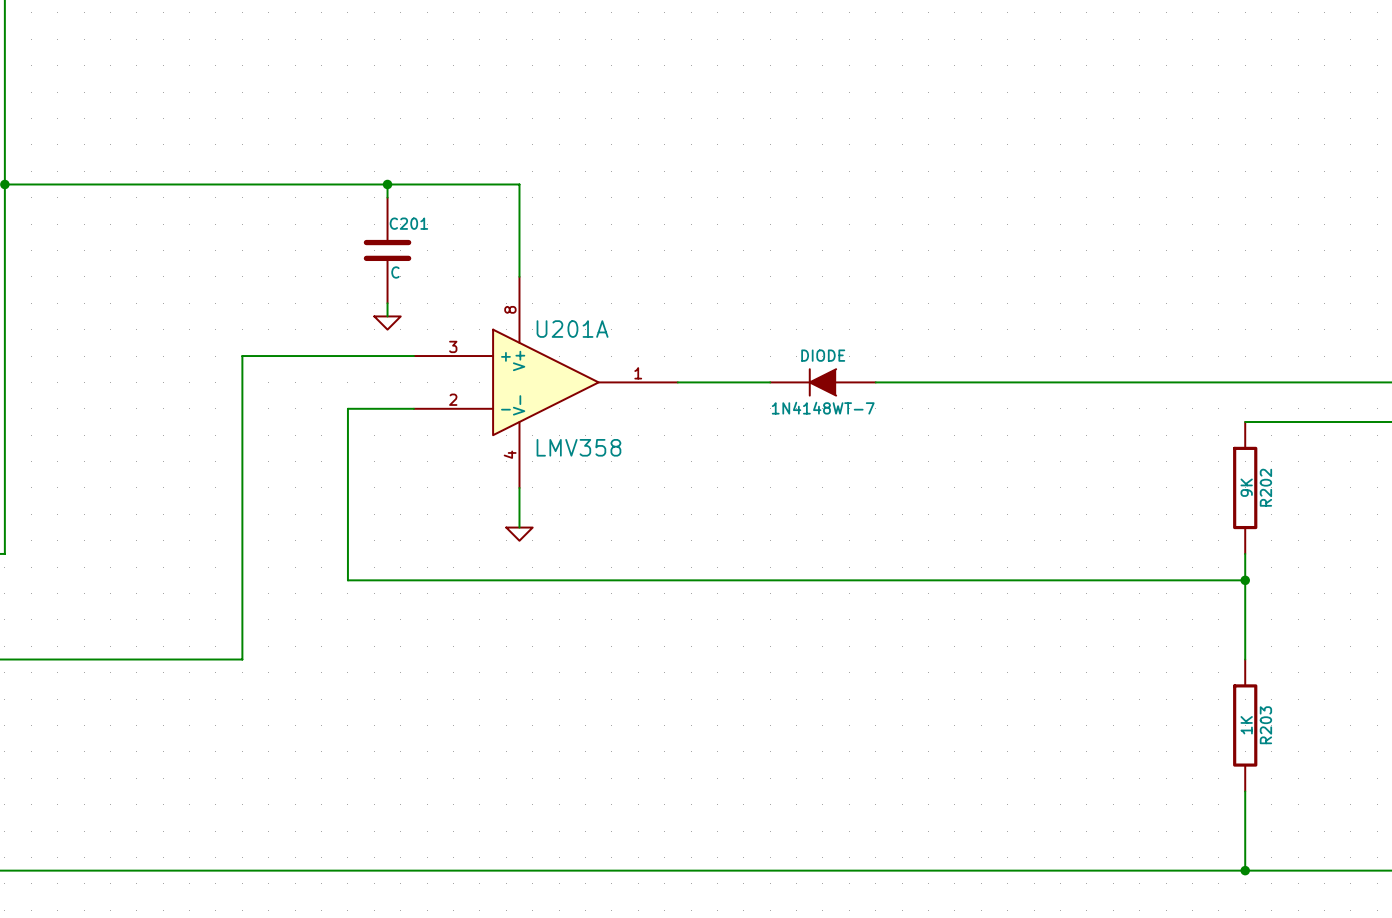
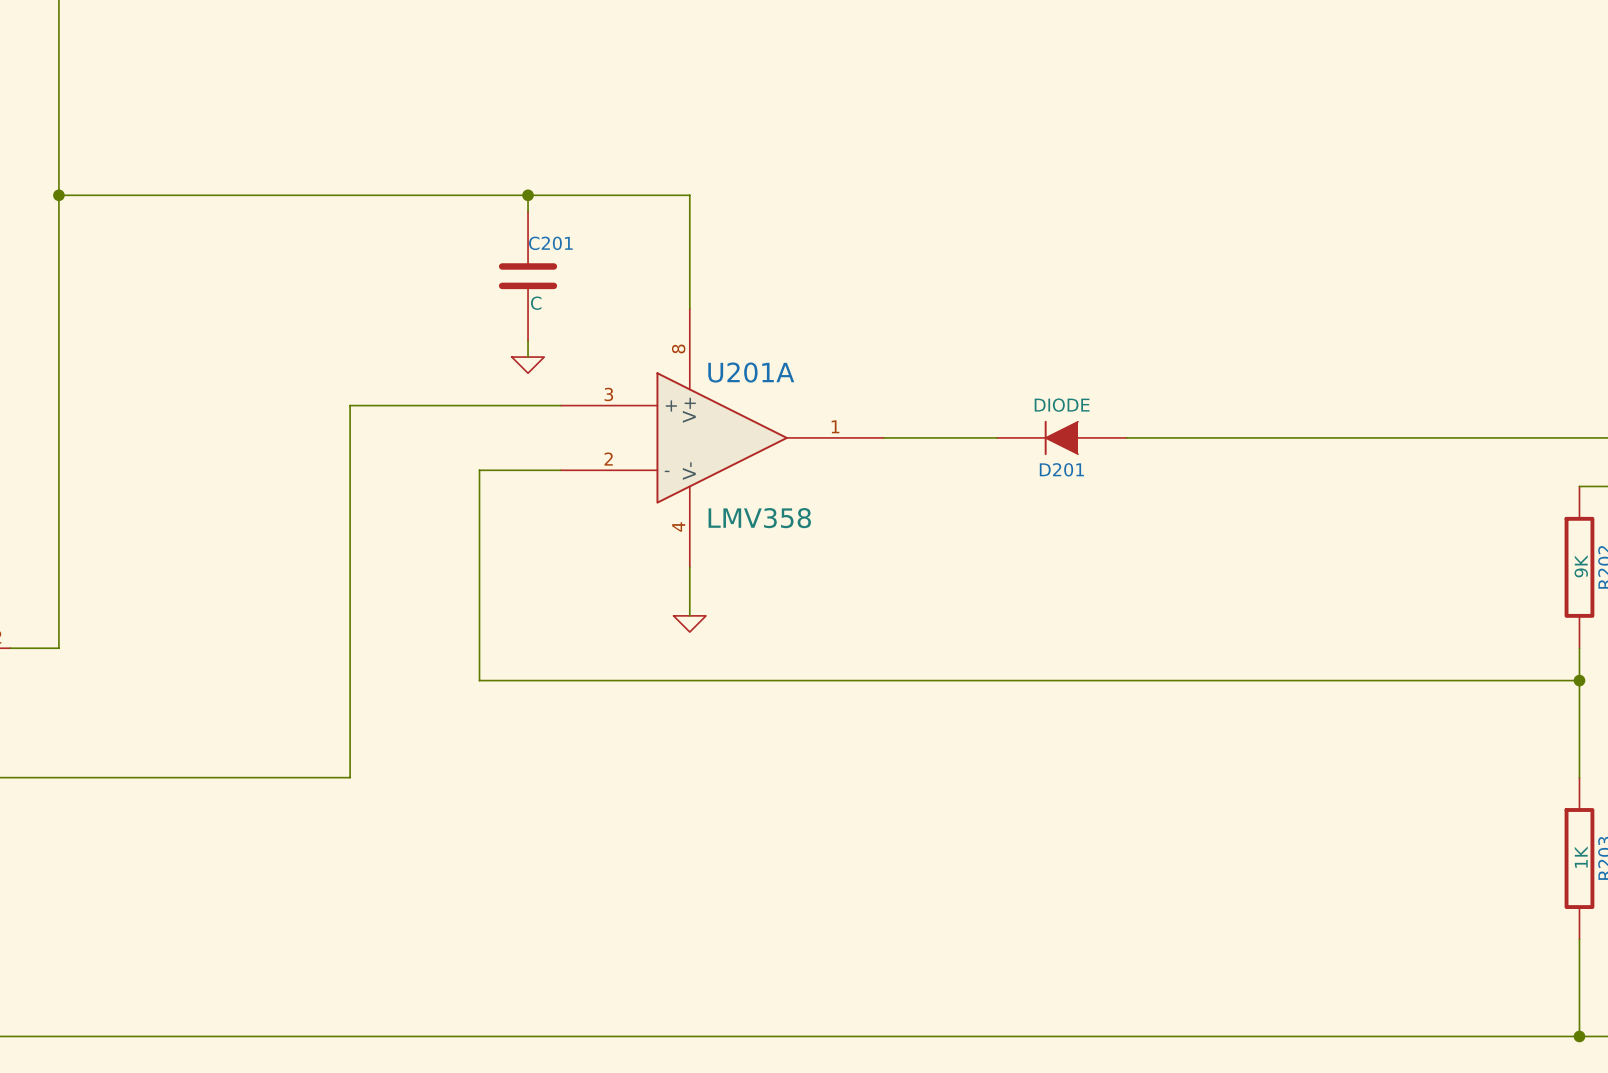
1N4148WT-7 name: 1N4148WT-7 (823, 408) -> D201 (1061, 469)

